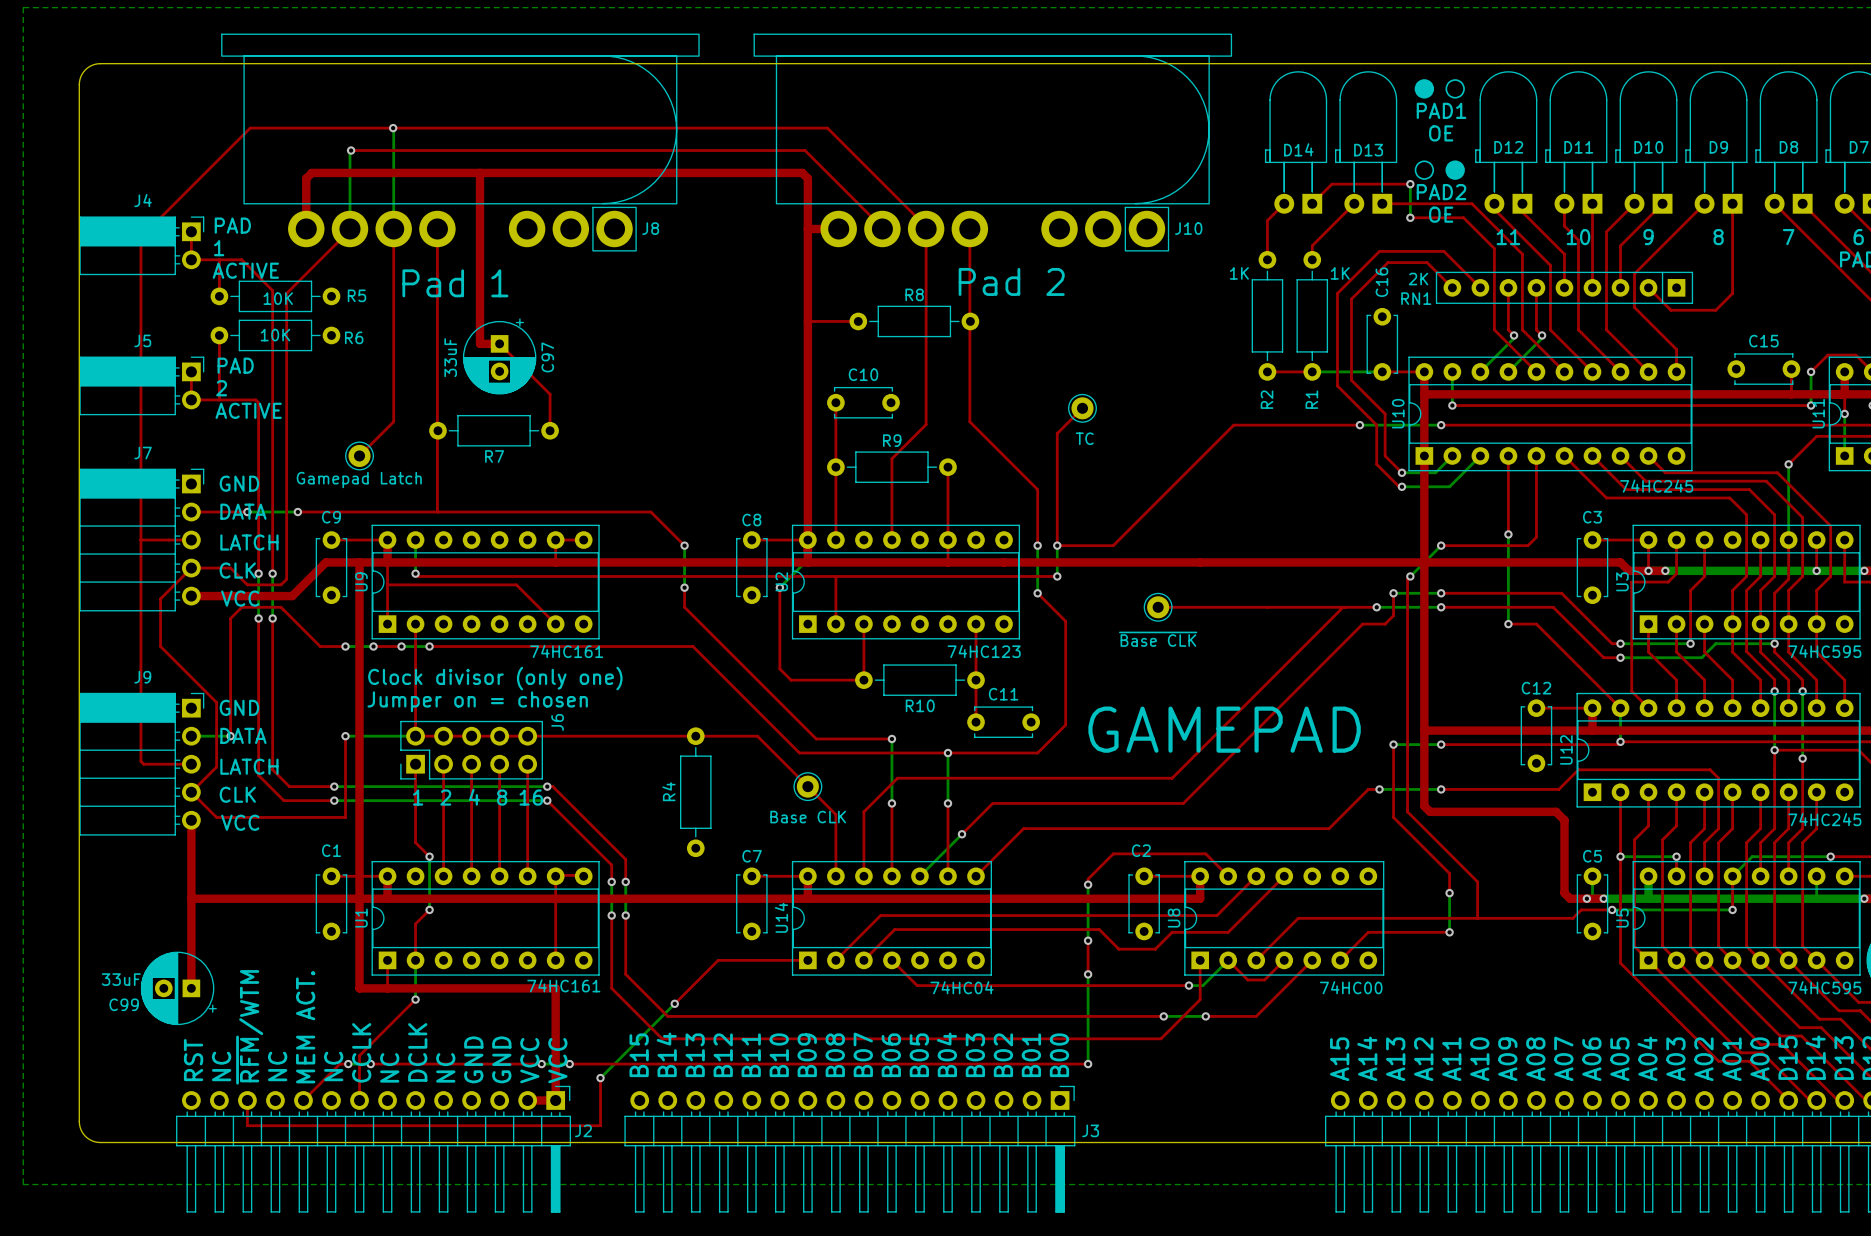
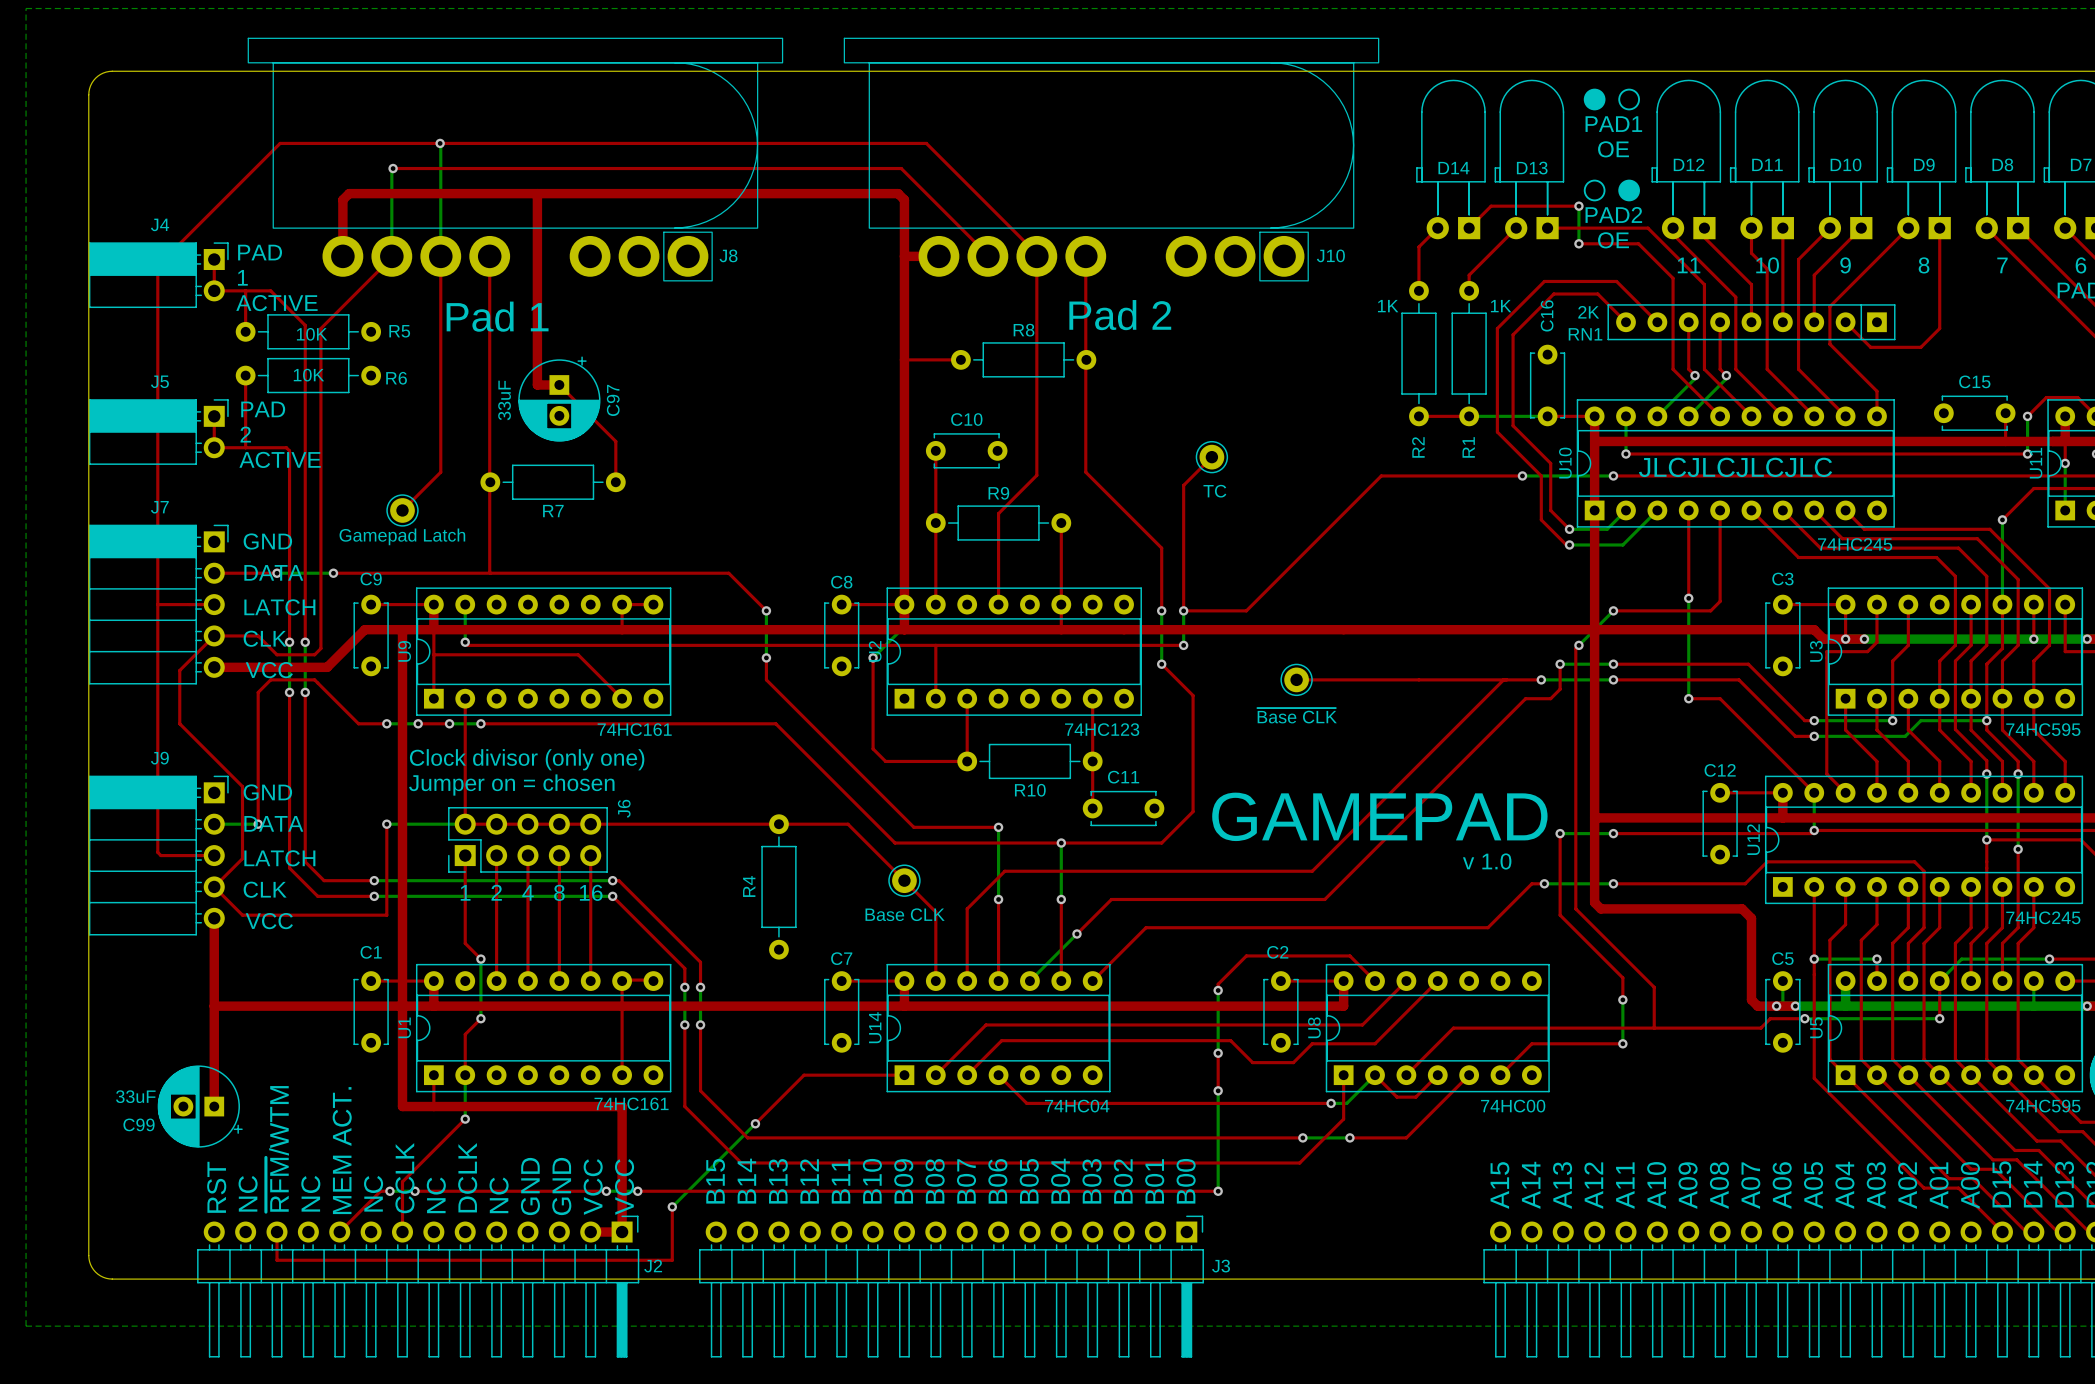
text: none -> JLCJLCJLCJLC (1735, 467)
text: none -> v 1.0 (1487, 861)

